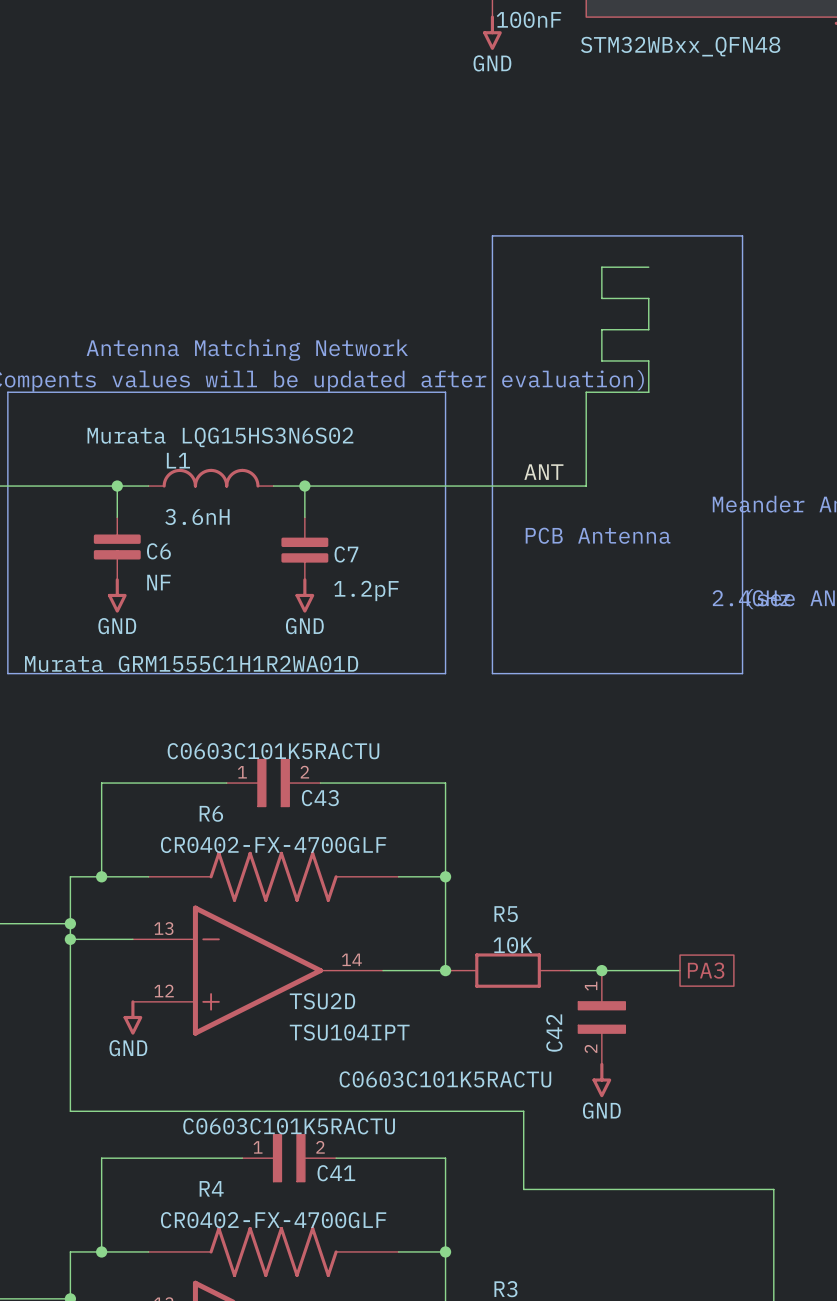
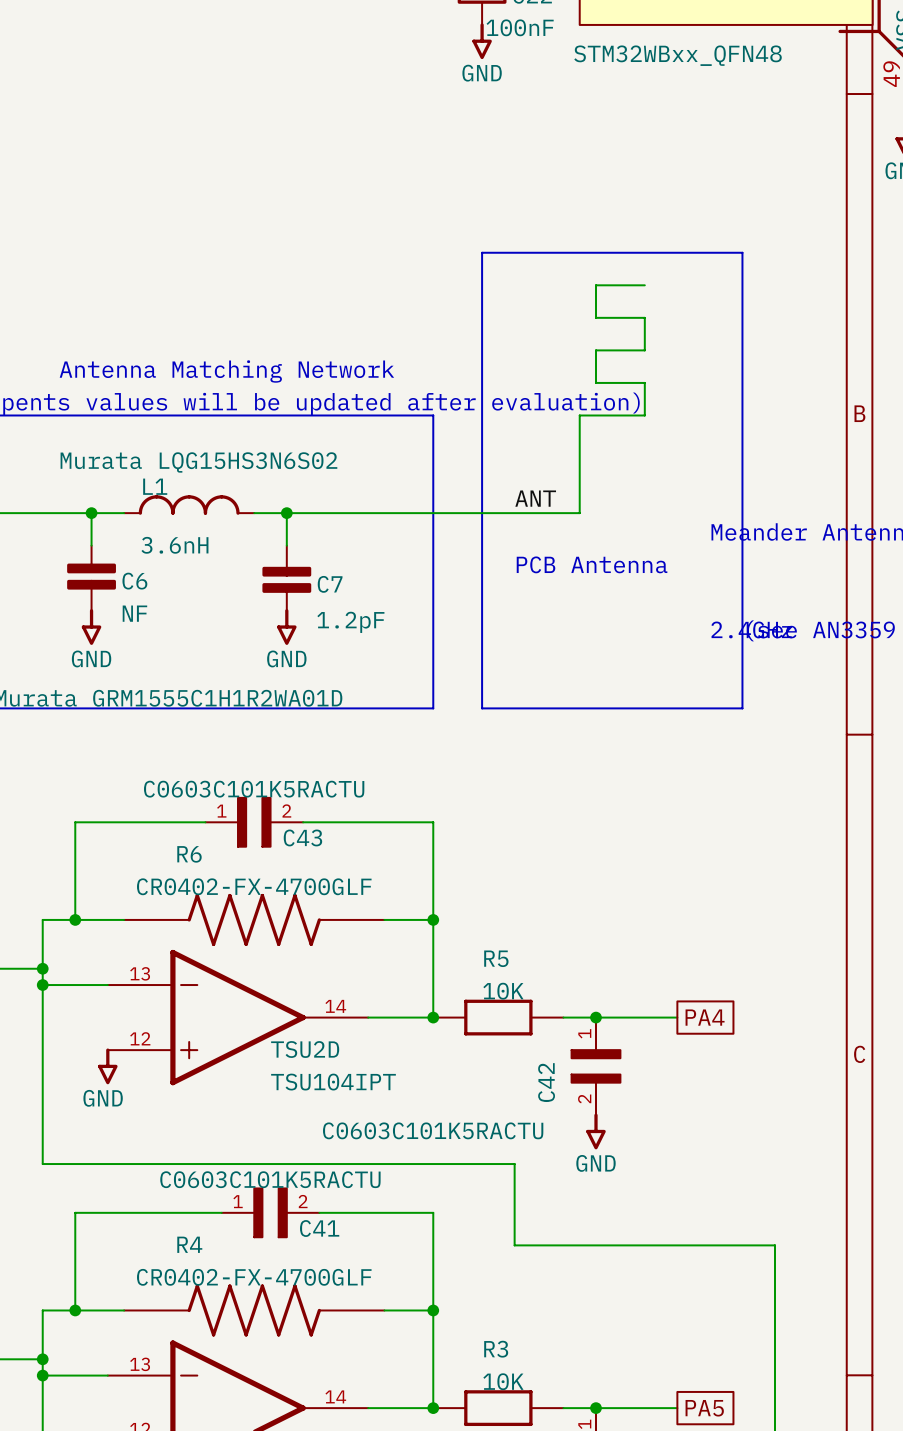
global label: PA3 (706, 970) -> PA4 (705, 1017)

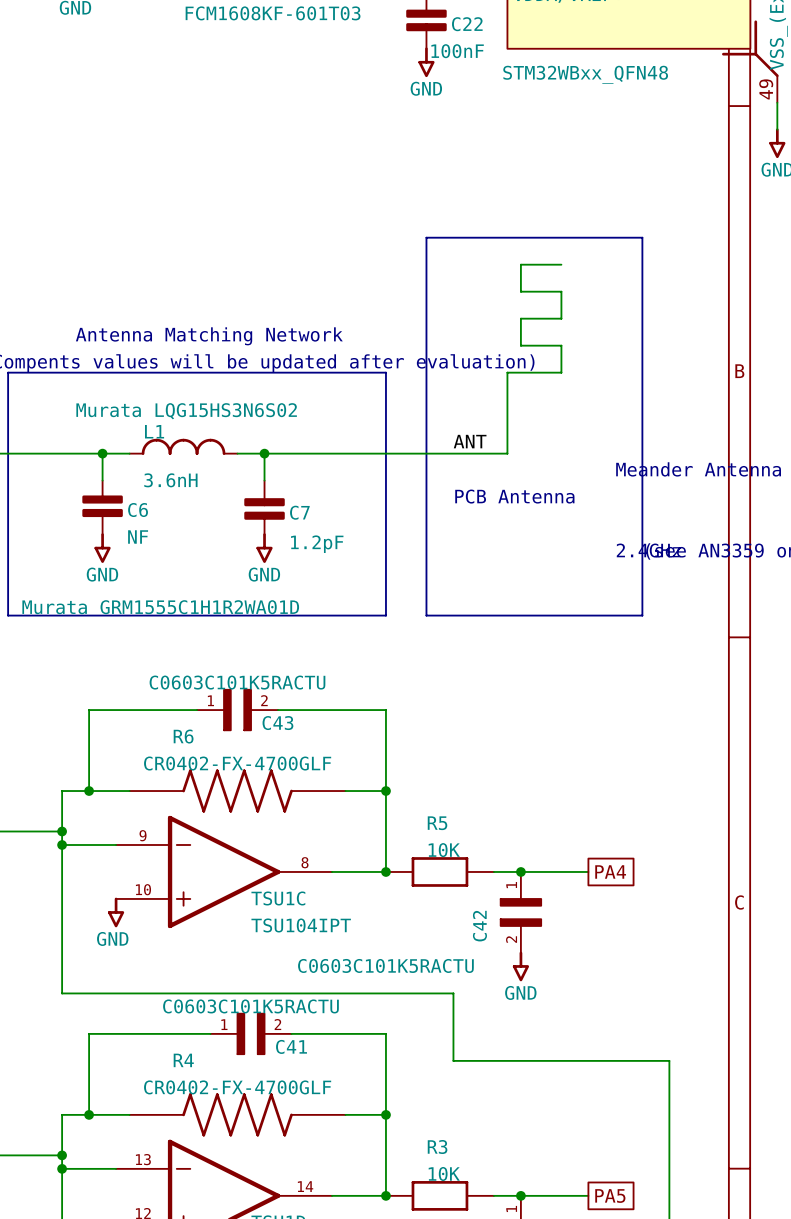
TSU2D pin number: 13 (140, 973) -> 9 (143, 835)
TSU2D pin number: 14 (335, 1006) -> 8 (305, 862)
TSU2D pin number: 12 (140, 1038) -> 10 (143, 889)
TSU2D name: TSU2D (305, 1049) -> TSU1C (278, 898)

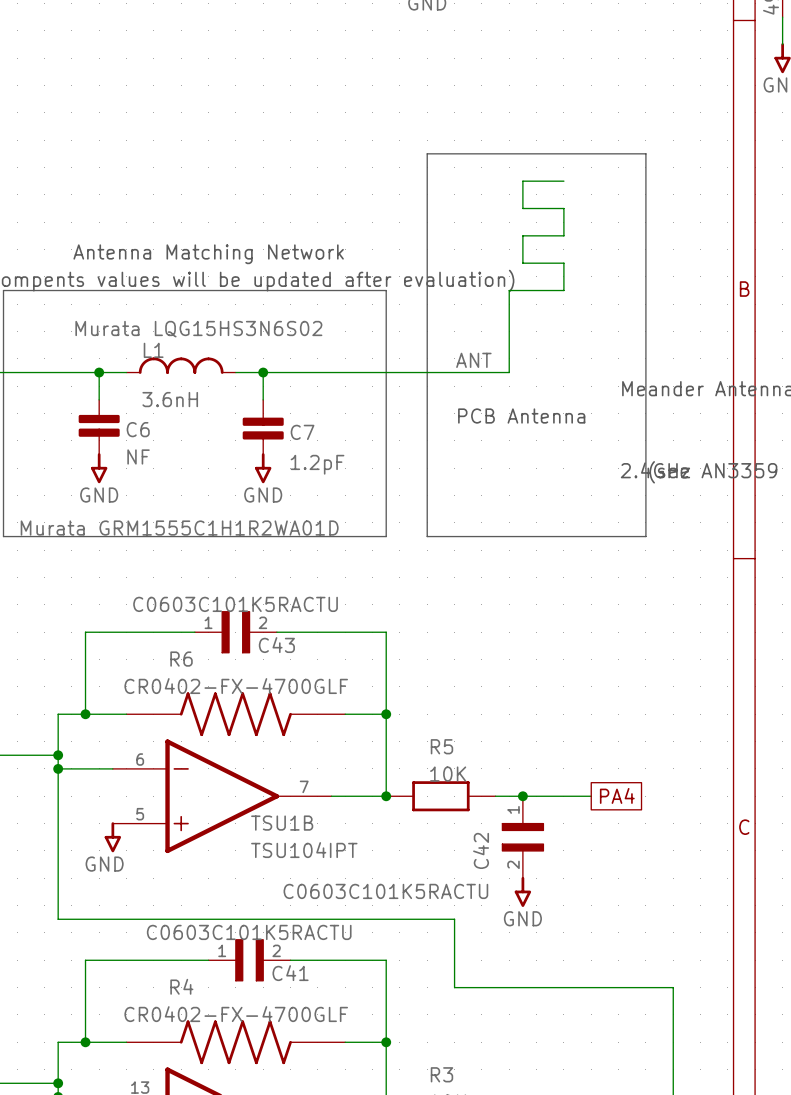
TSU1C pin number: 9 (143, 835) -> 6 (140, 759)
TSU1C pin number: 8 (305, 862) -> 7 (304, 786)
TSU1C pin number: 10 (143, 889) -> 5 (140, 814)
TSU1C name: TSU1C (278, 898) -> TSU1B (282, 823)

